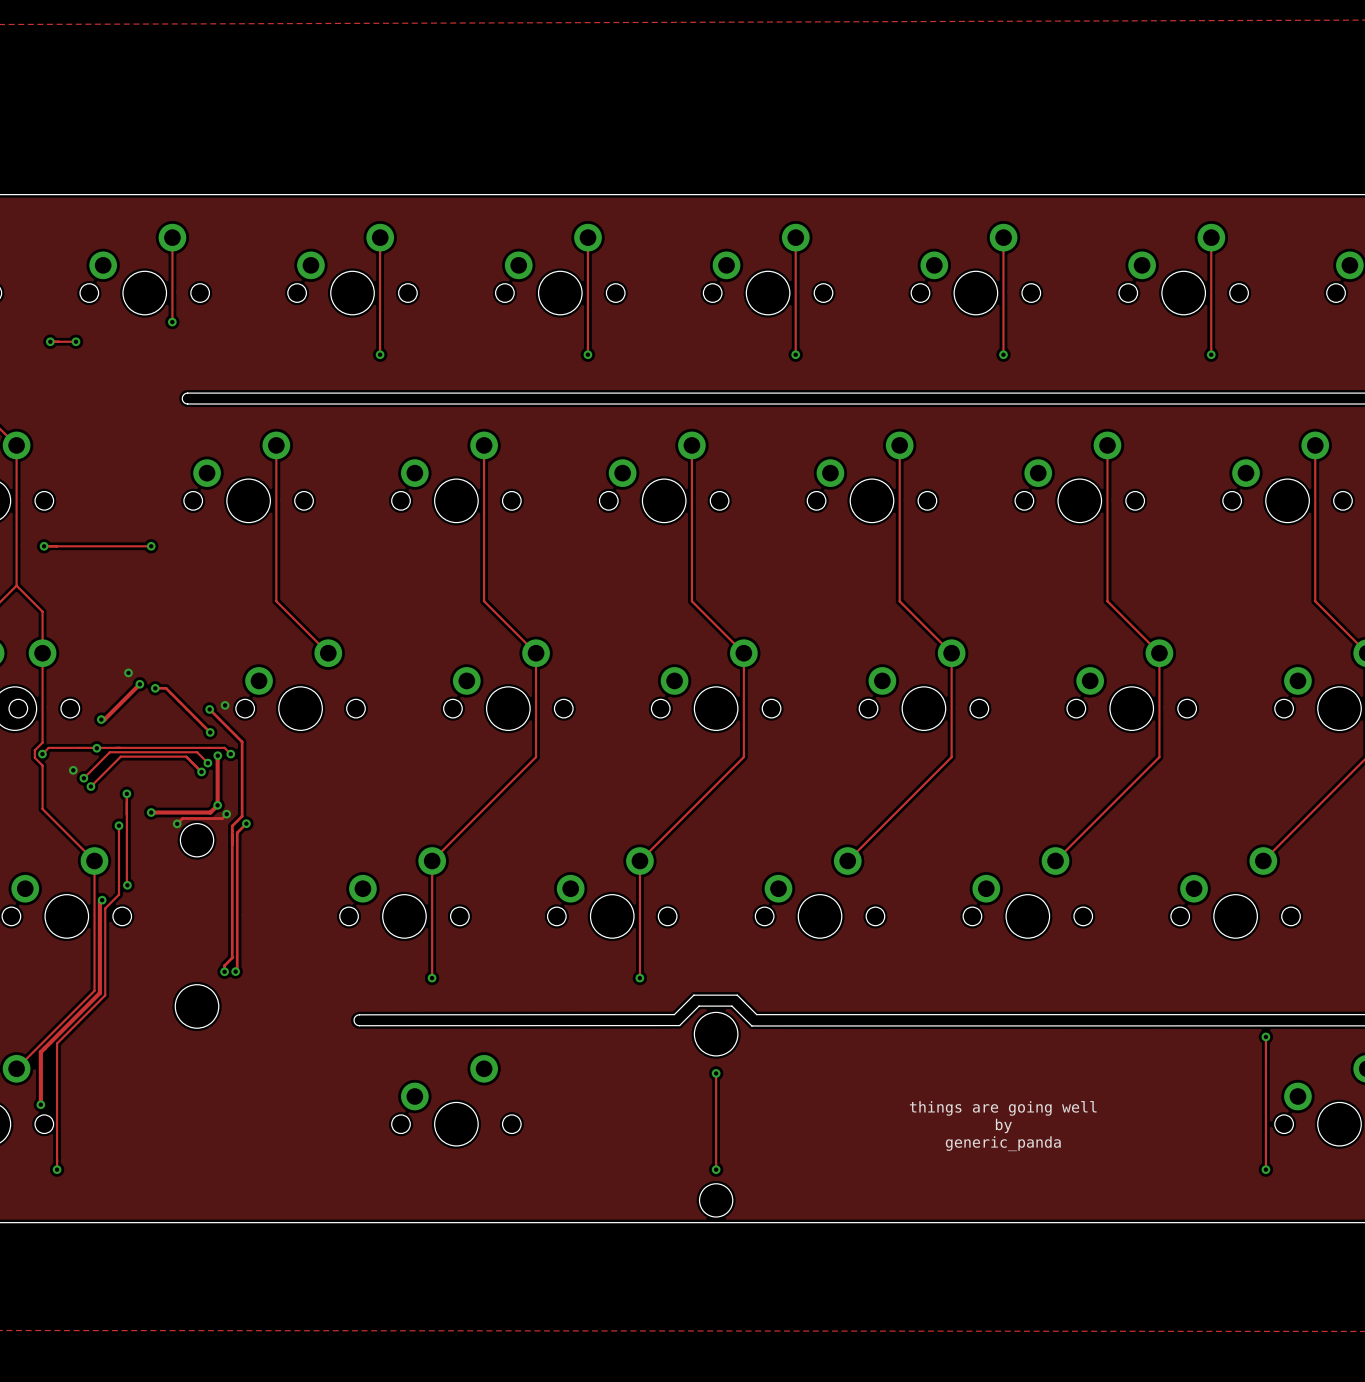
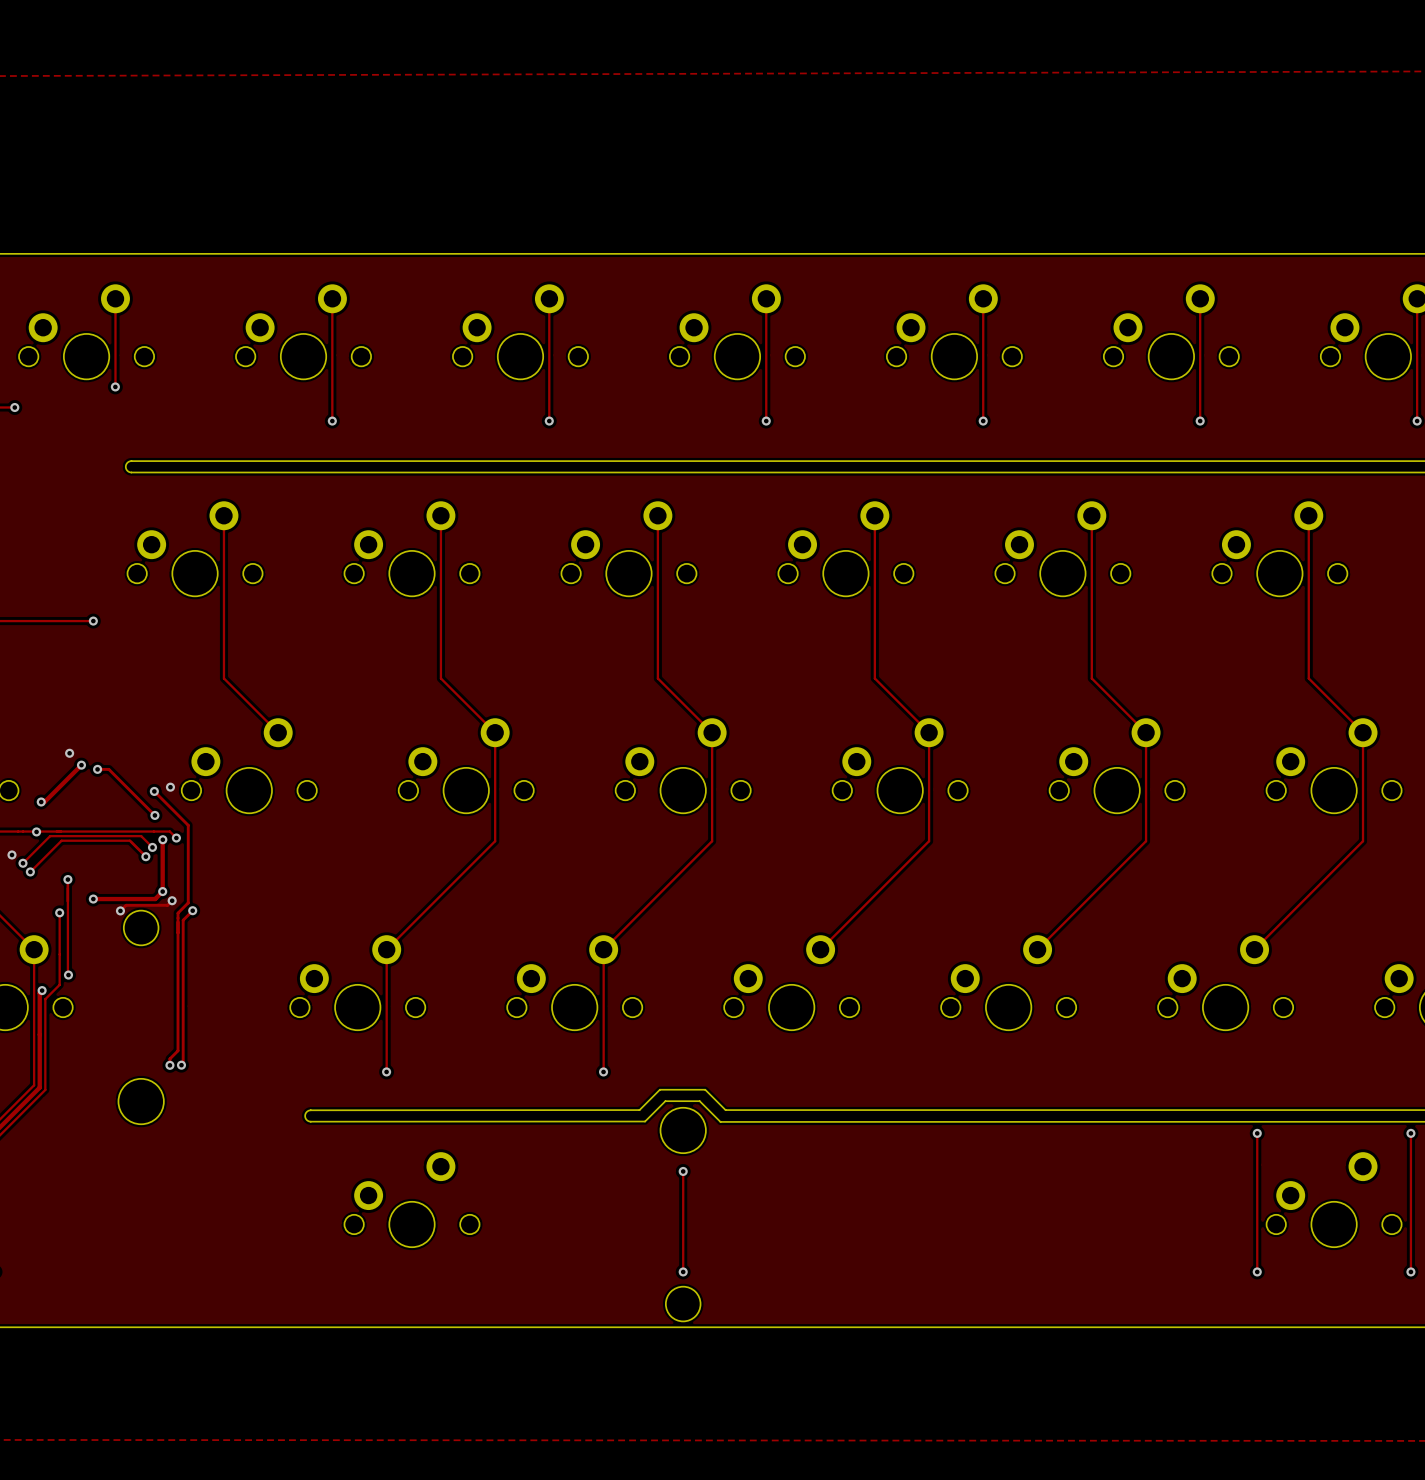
text: things are going well (1003, 1108) -> none
text: by (1003, 1125) -> none
text: generic_panda (1003, 1143) -> none

